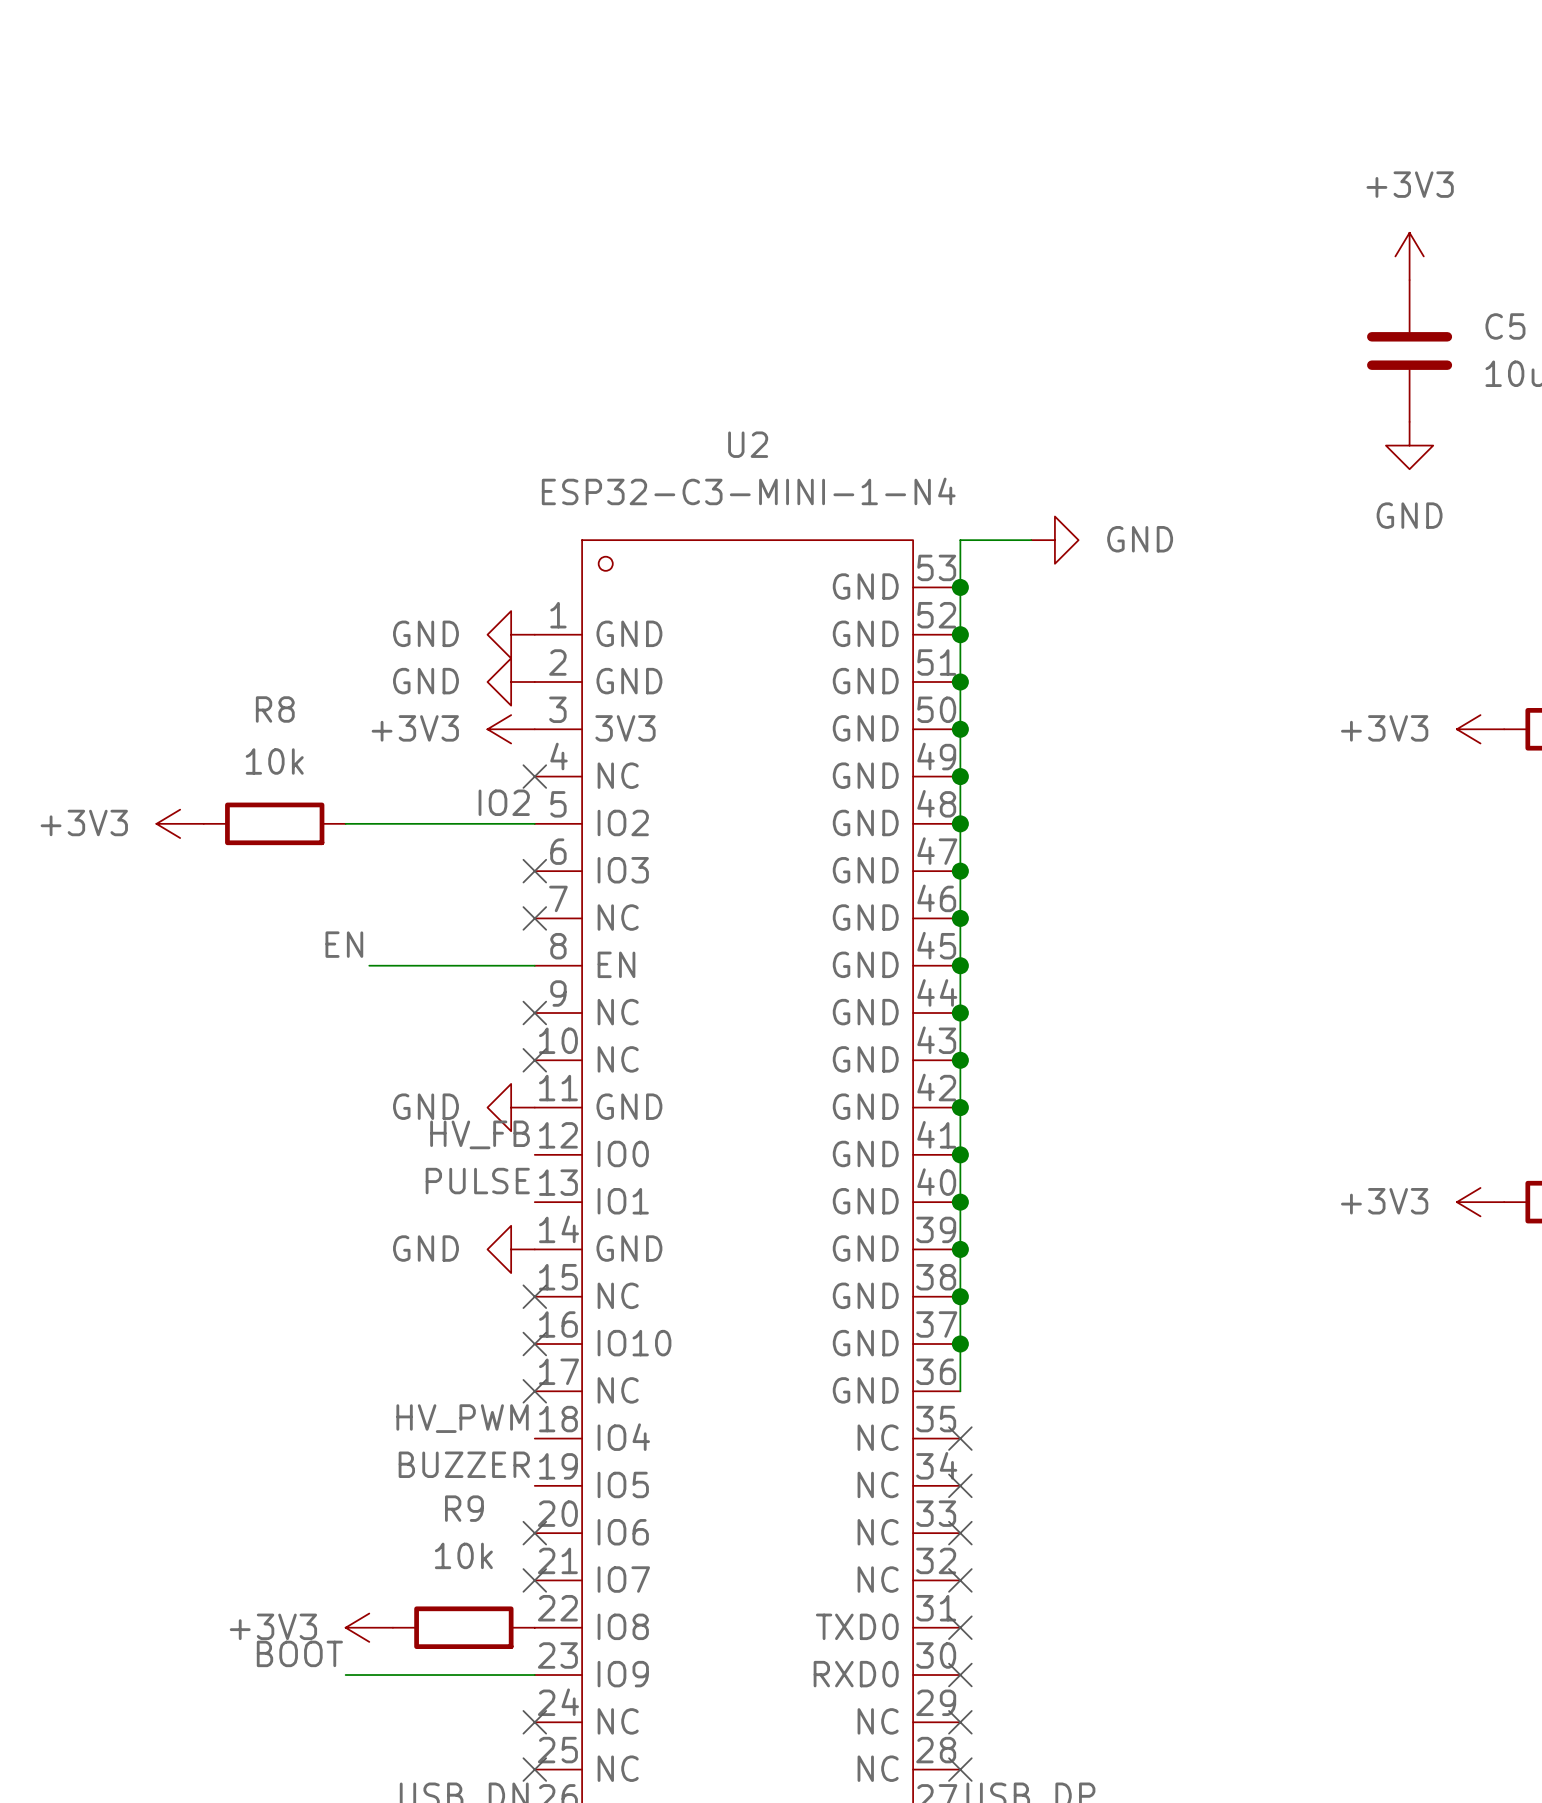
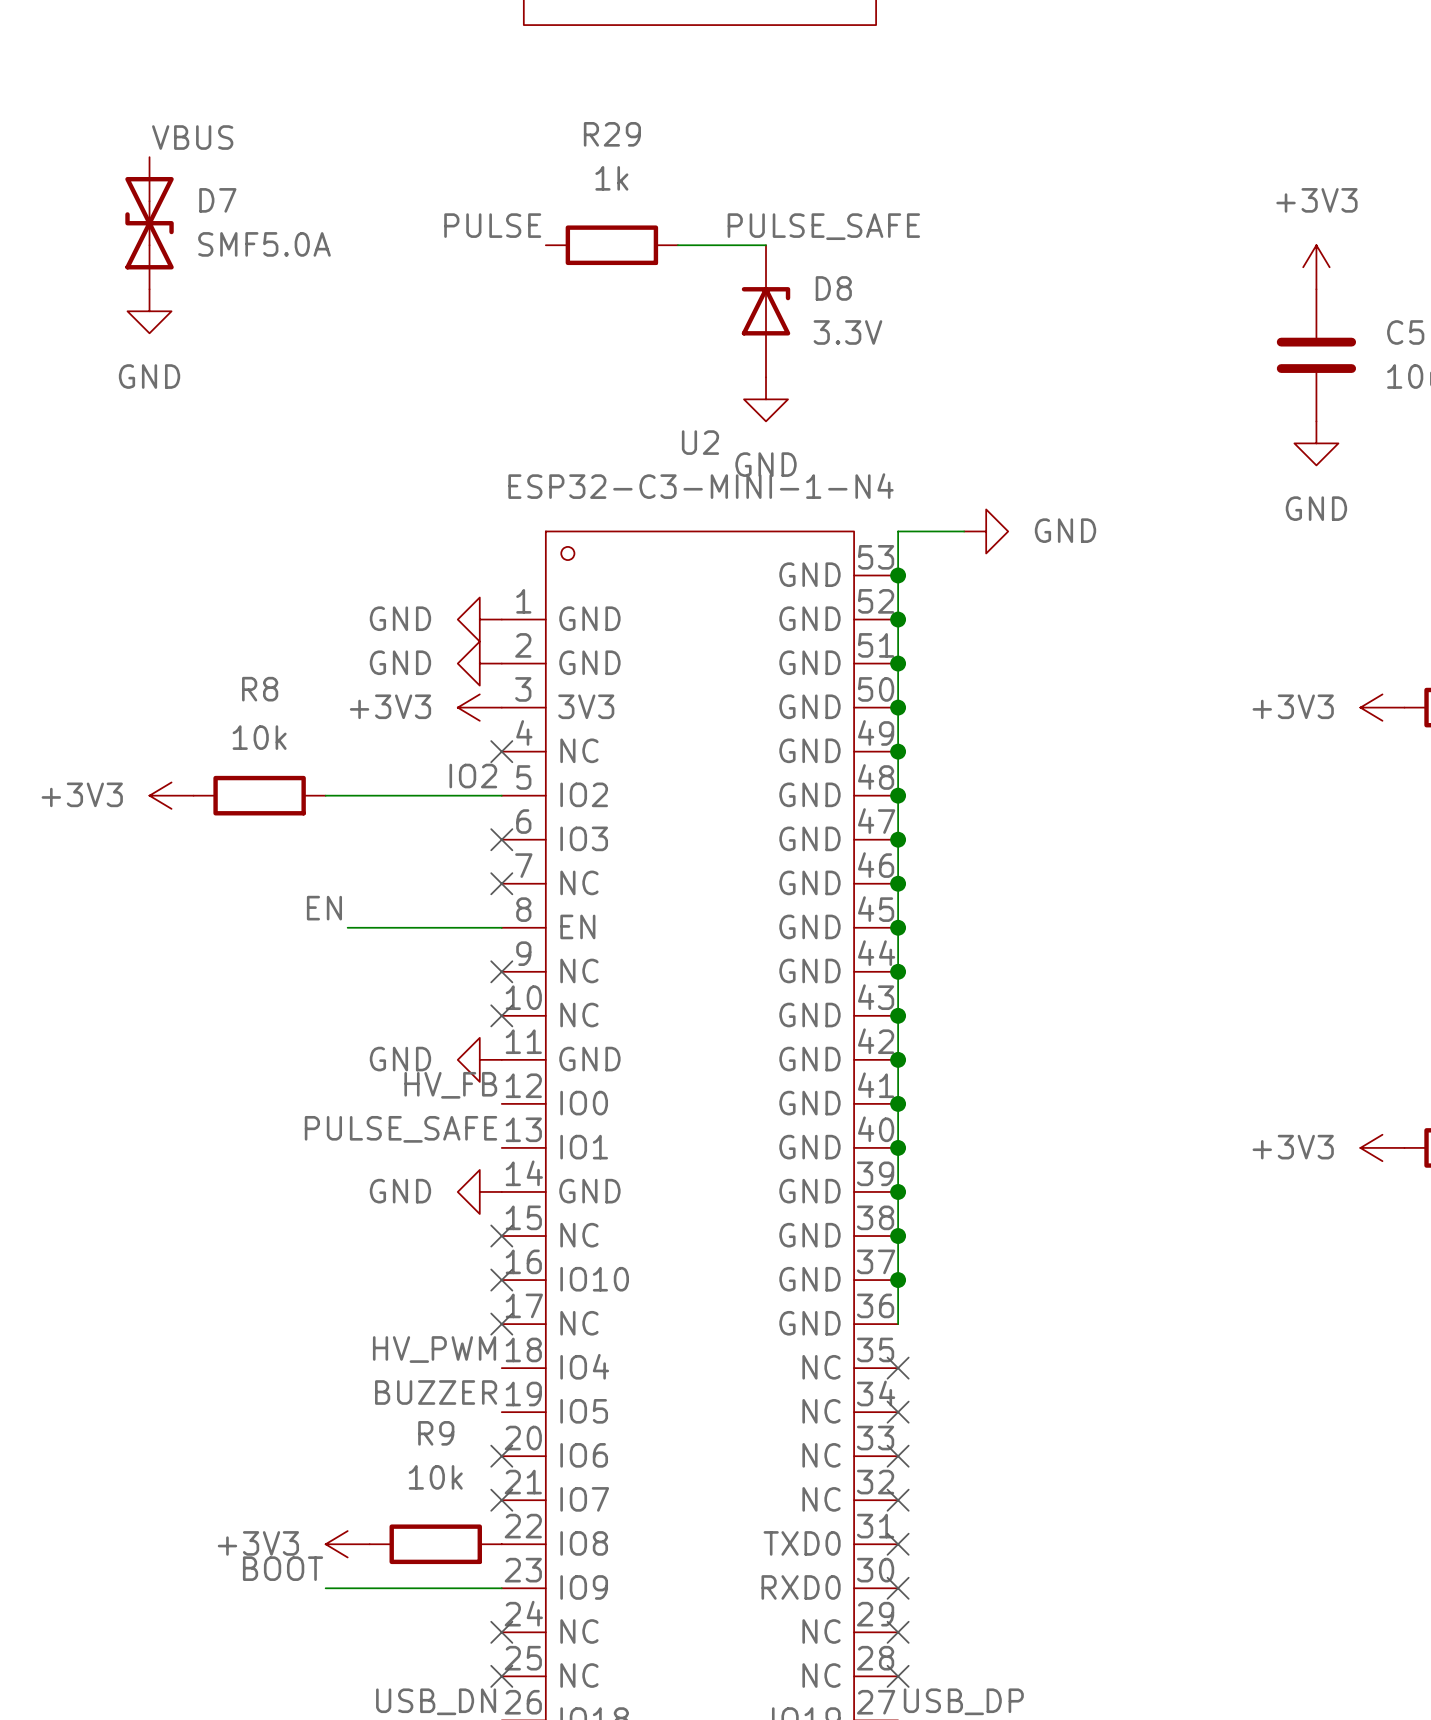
label: none -> VBUS (192, 137)
D7: none -> SMF5.0A (149, 223)
label: none -> PULSE (492, 225)
label: none -> PULSE_SAFE (823, 226)
R29: none -> 1k (611, 245)
wire: none -> (677, 245) (766, 245)
power symbol: none -> GND (149, 311)
D8: none -> 3.3V (766, 311)
power symbol: none -> GND (766, 399)
label: PULSE (477, 1181) -> PULSE_SAFE (400, 1129)

